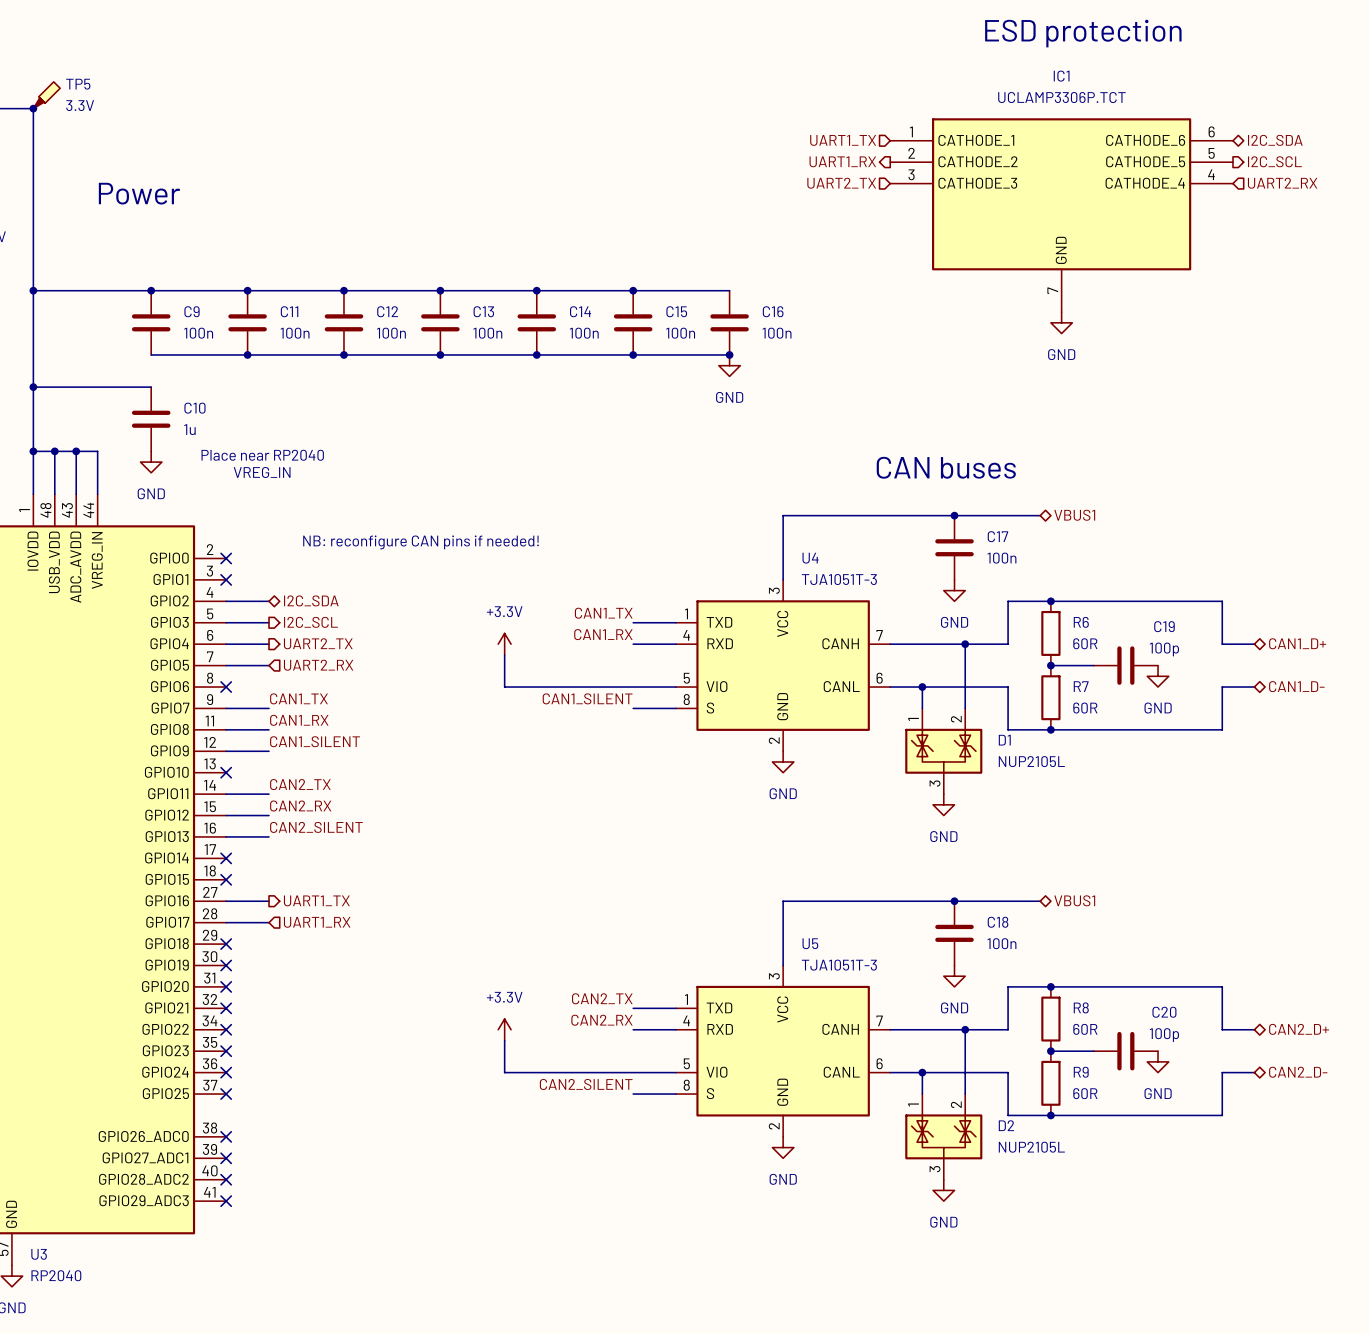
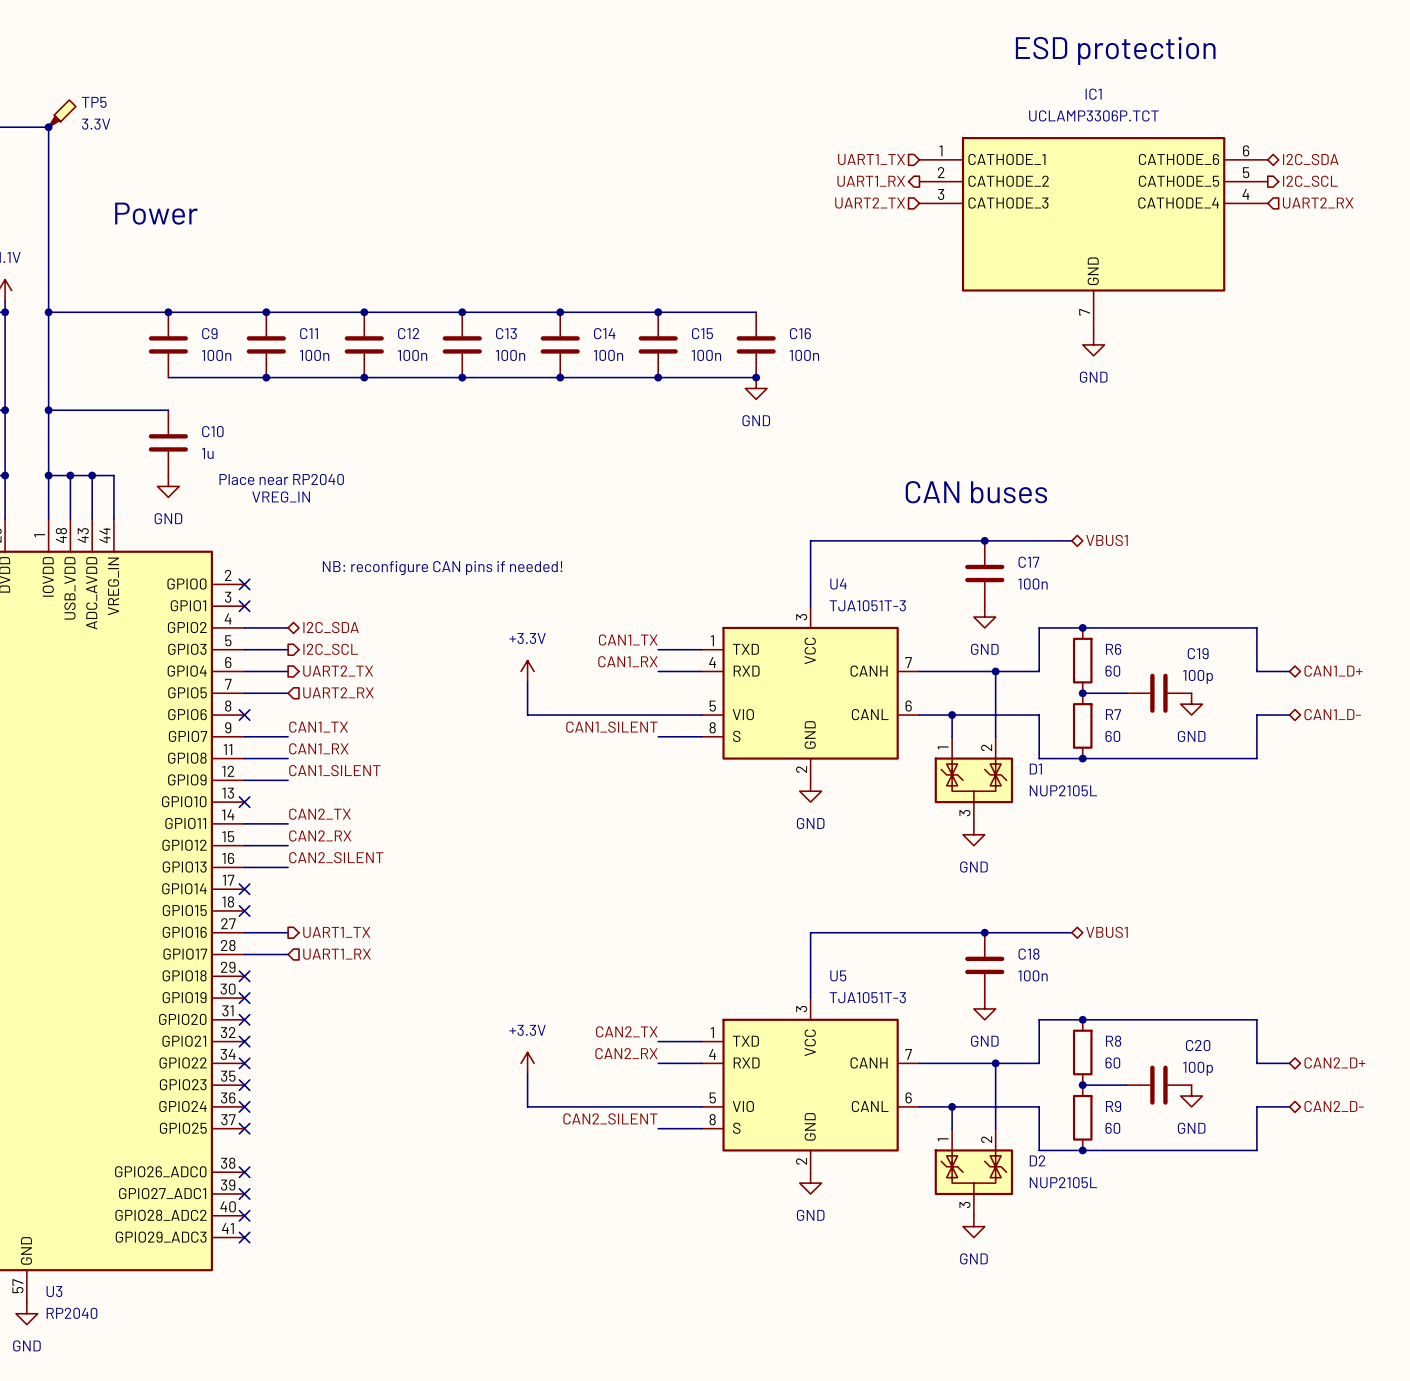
R6 value: 60R (1085, 643) -> 60 (1112, 671)
R7 value: 60R (1085, 708) -> 60 (1112, 736)
R8 value: 60R (1085, 1029) -> 60 (1112, 1062)
R9 value: 60R (1085, 1093) -> 60 (1112, 1128)

